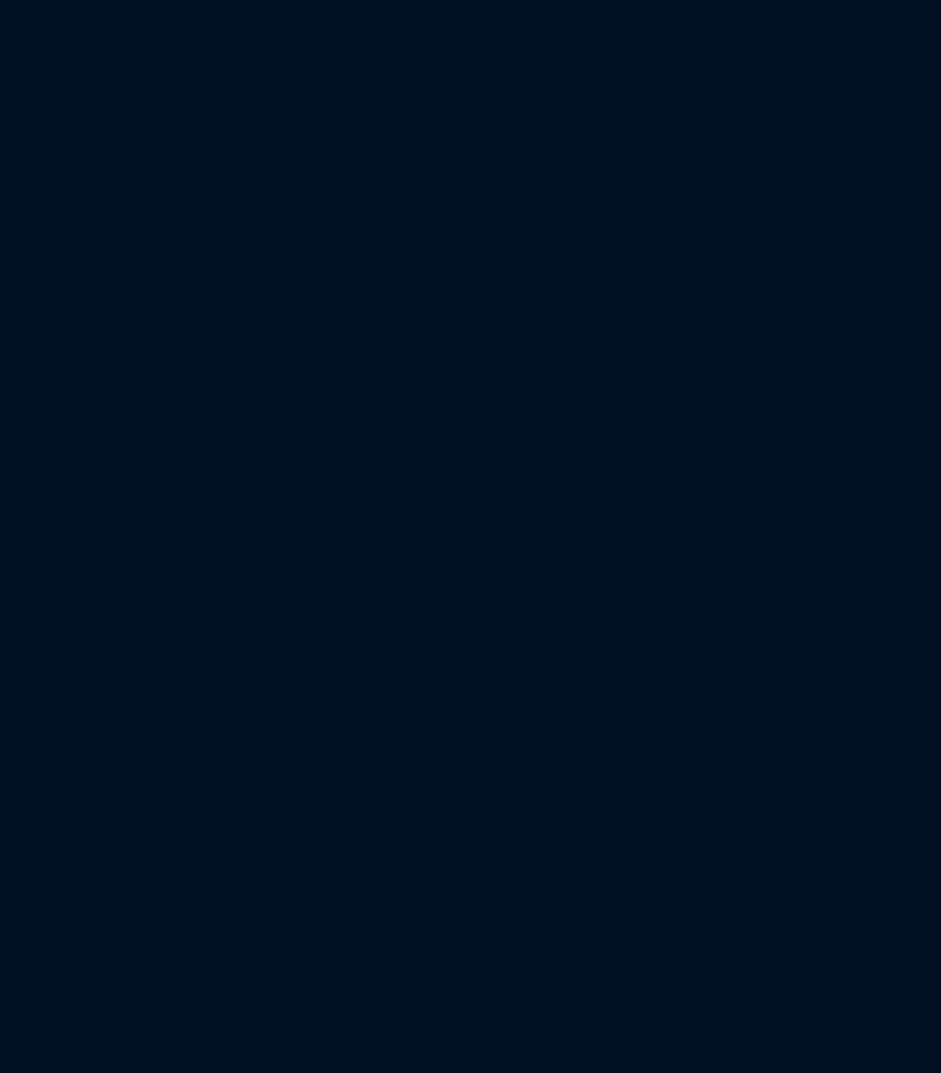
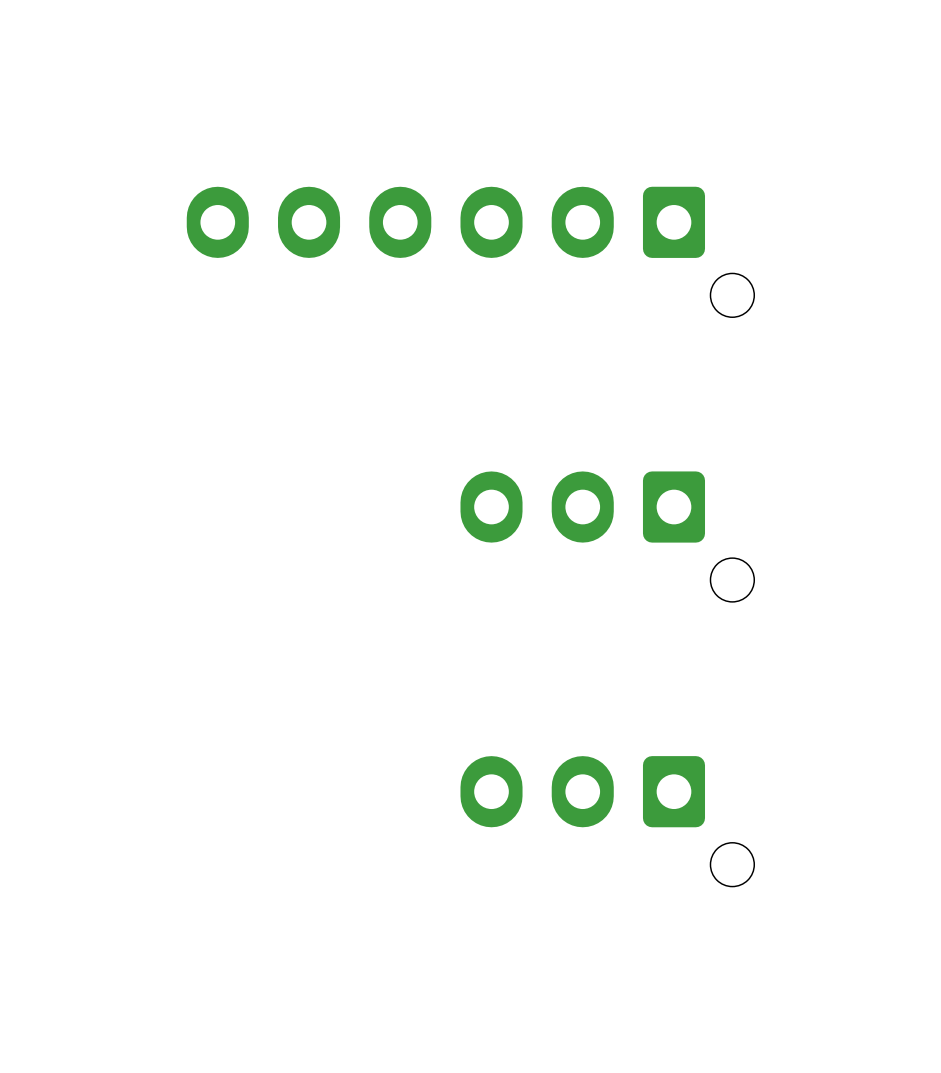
part: none -> (470, 252)
part: none -> (607, 536)
part: none -> (607, 821)

